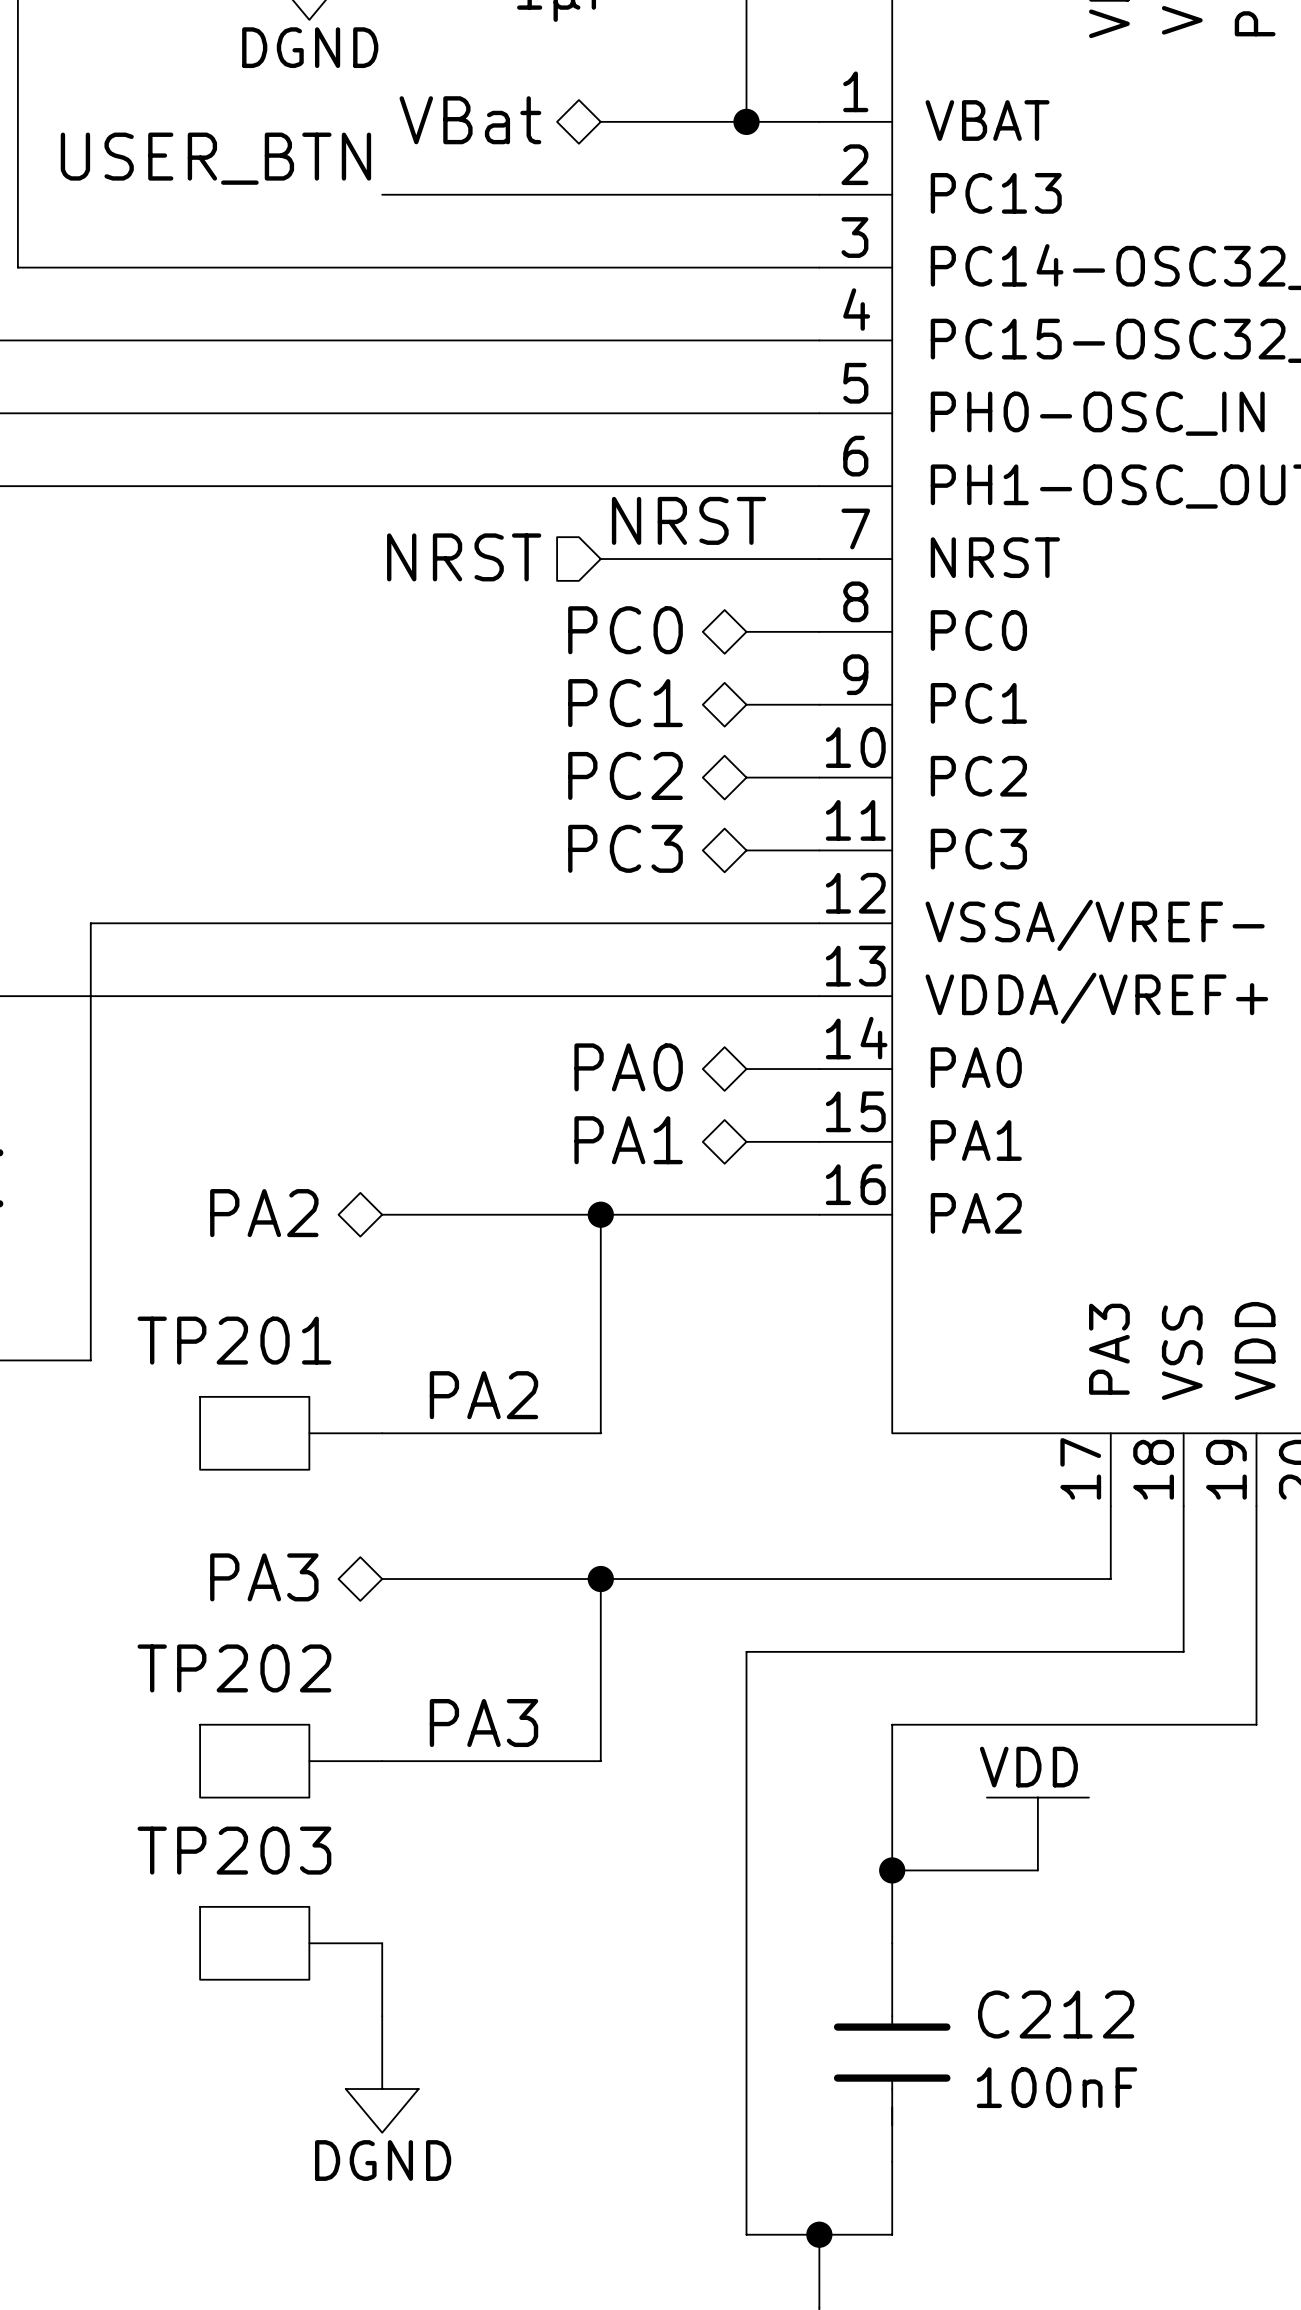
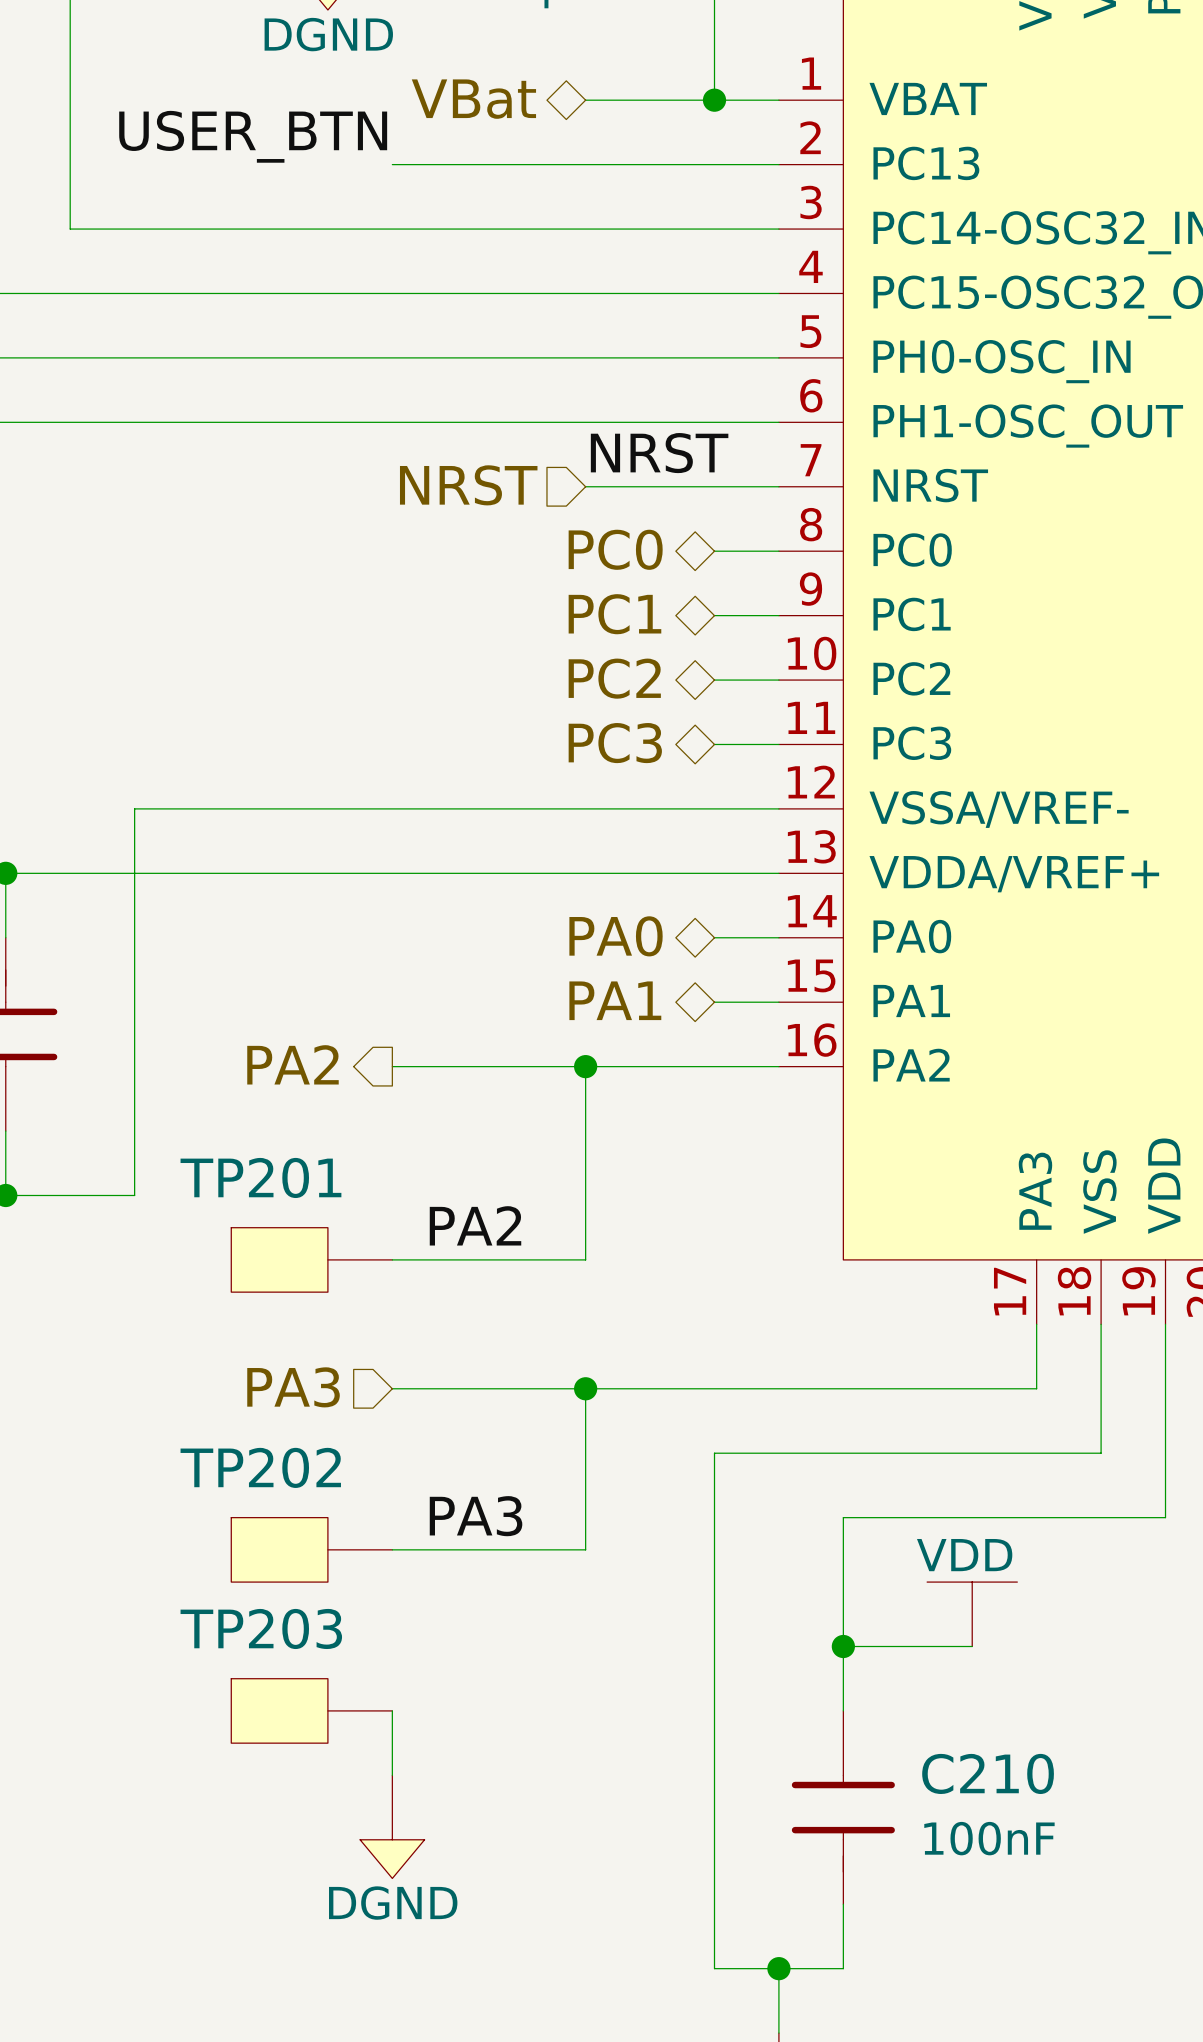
hierarchical label shape: bidirectional (264, 1213) -> output (292, 1064)
hierarchical label shape: bidirectional (264, 1577) -> input (293, 1387)
C212 name: C212 (1056, 2014) -> C210 (988, 1773)

